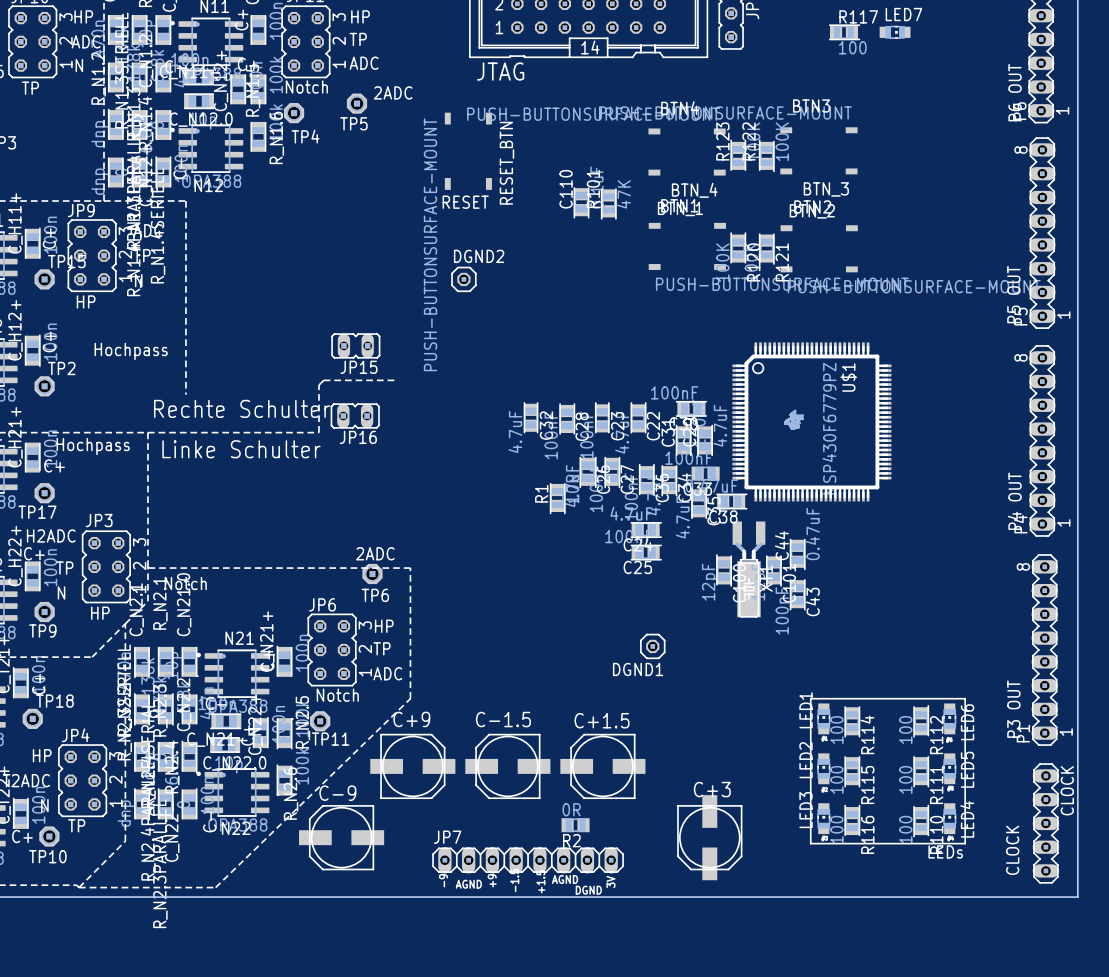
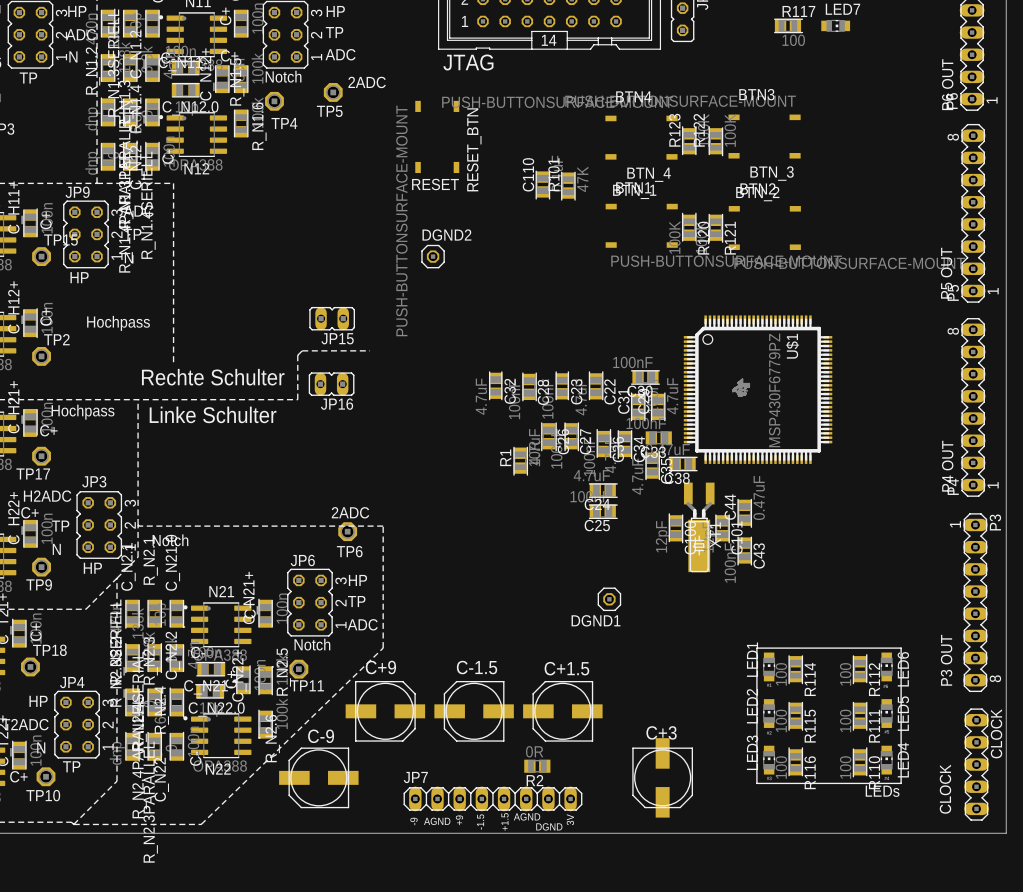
P1 text position: 8 (1023, 566) -> 8 (995, 678)
P1 text position: 1 (1066, 732) -> 1 (955, 524)
P1 name: P1 (1023, 733) -> P3 (995, 522)

